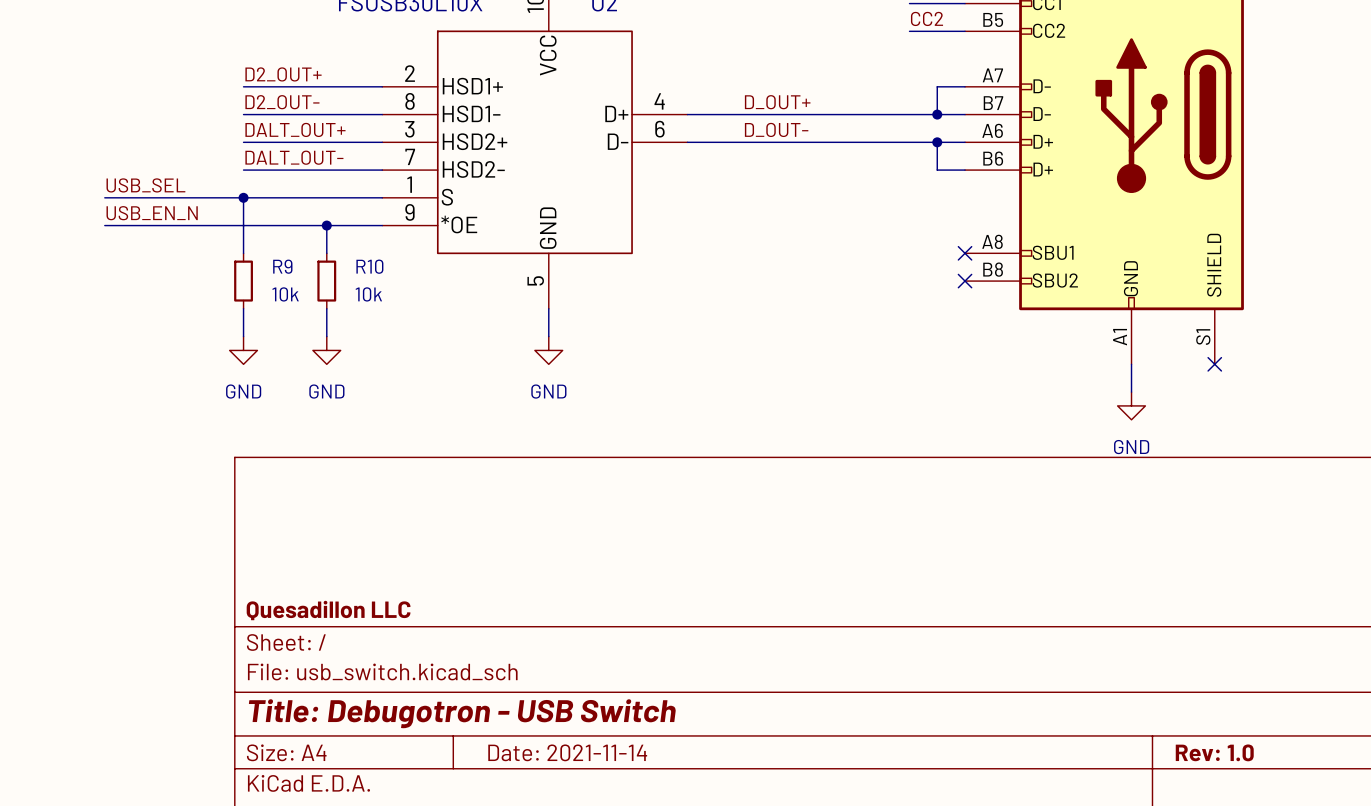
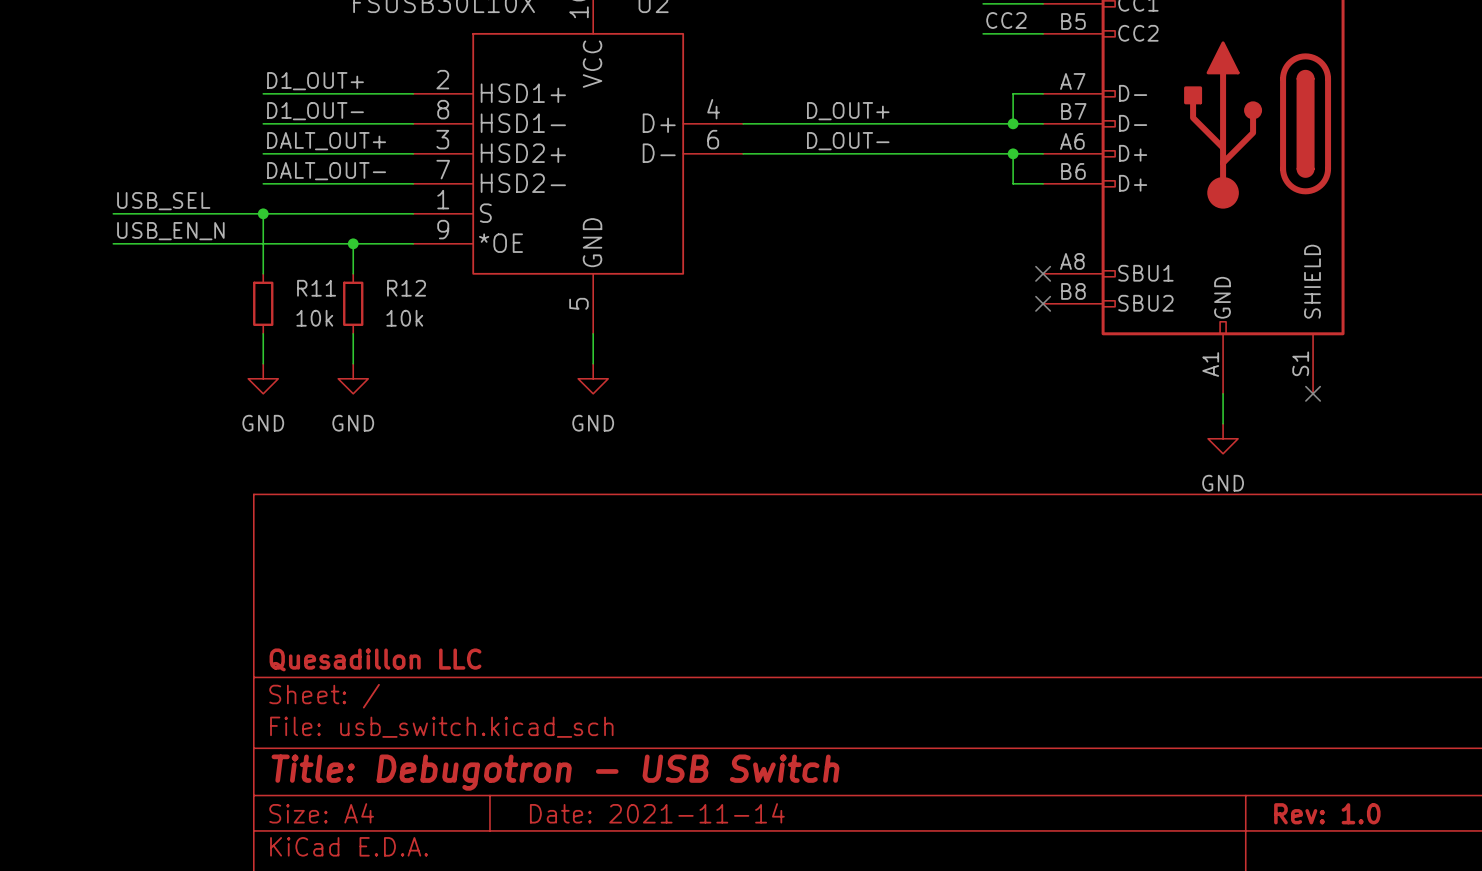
label: D2_OUT+ (283, 74) -> D1_OUT+ (315, 81)
label: D2_OUT- (282, 102) -> D1_OUT- (315, 111)
R9 name: R9 (282, 266) -> R11 (316, 288)
R10 name: R10 (369, 266) -> R12 (406, 288)

